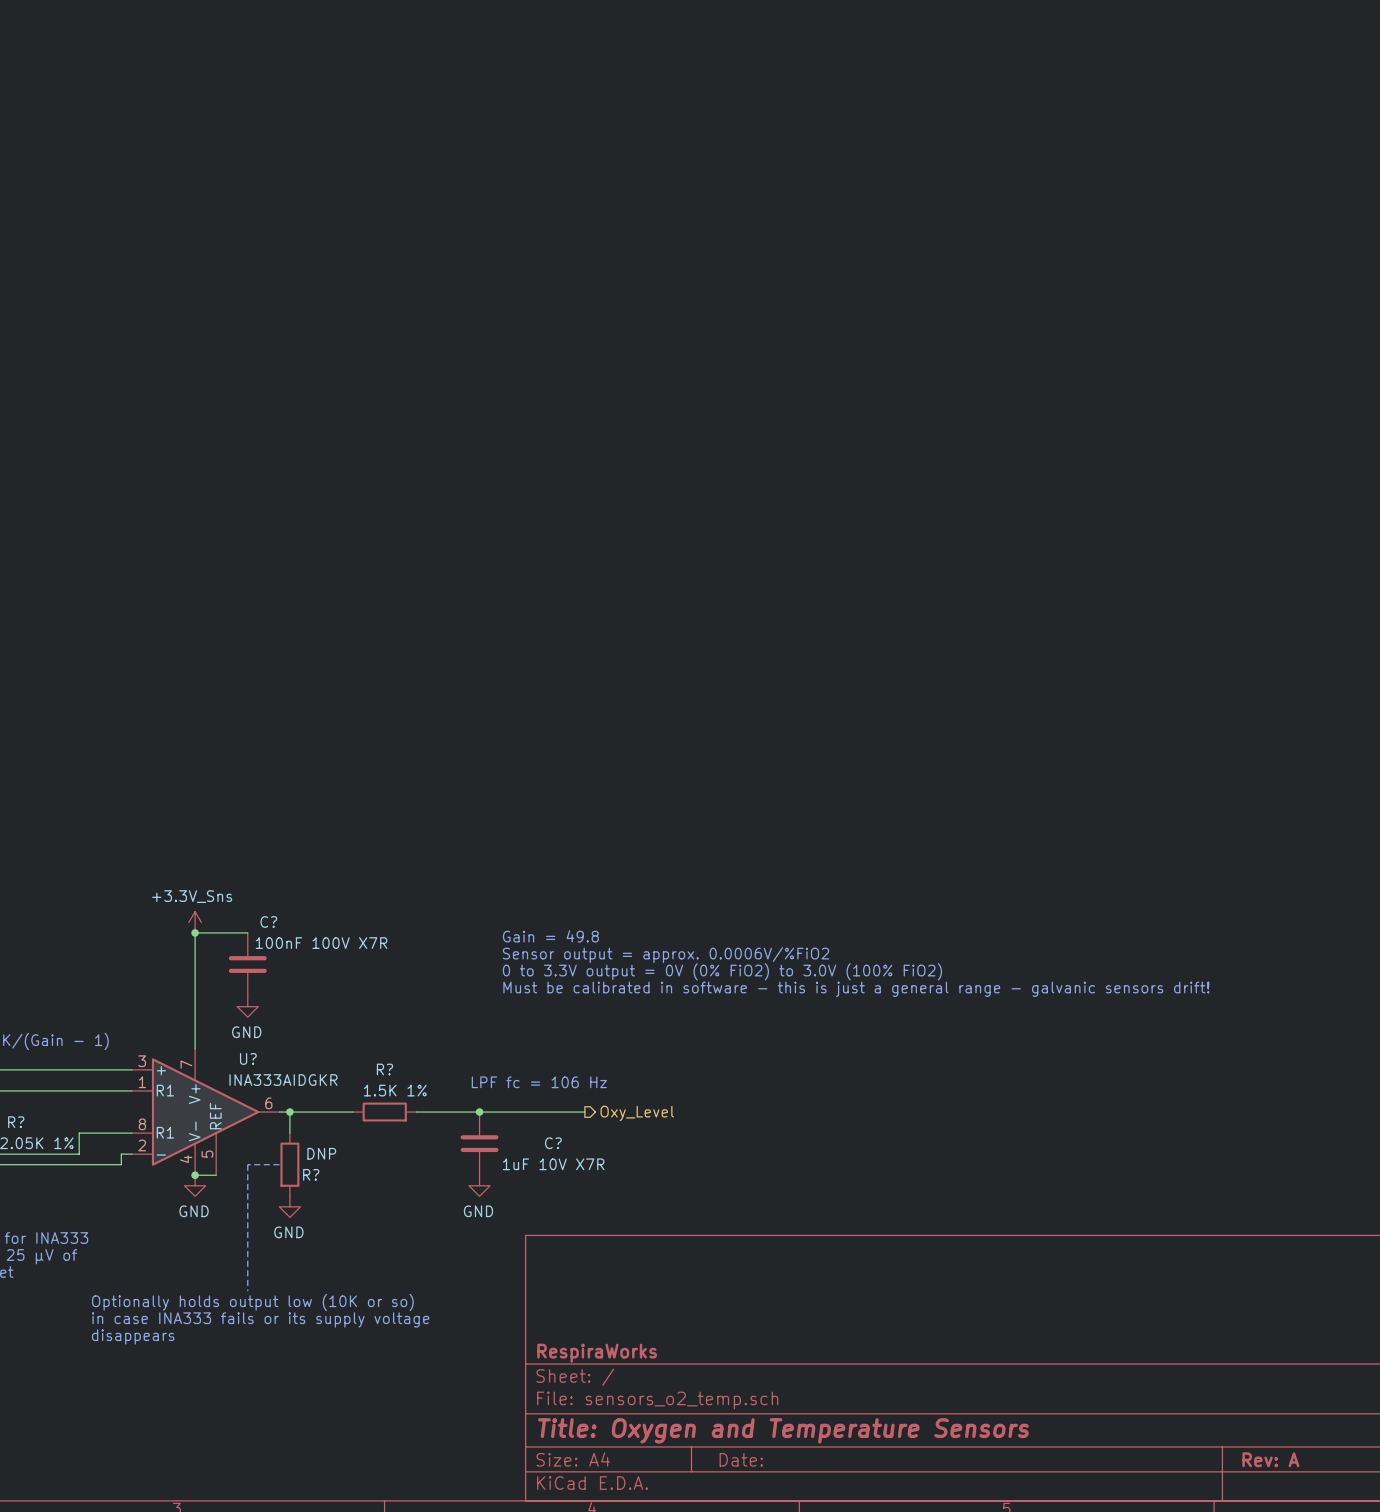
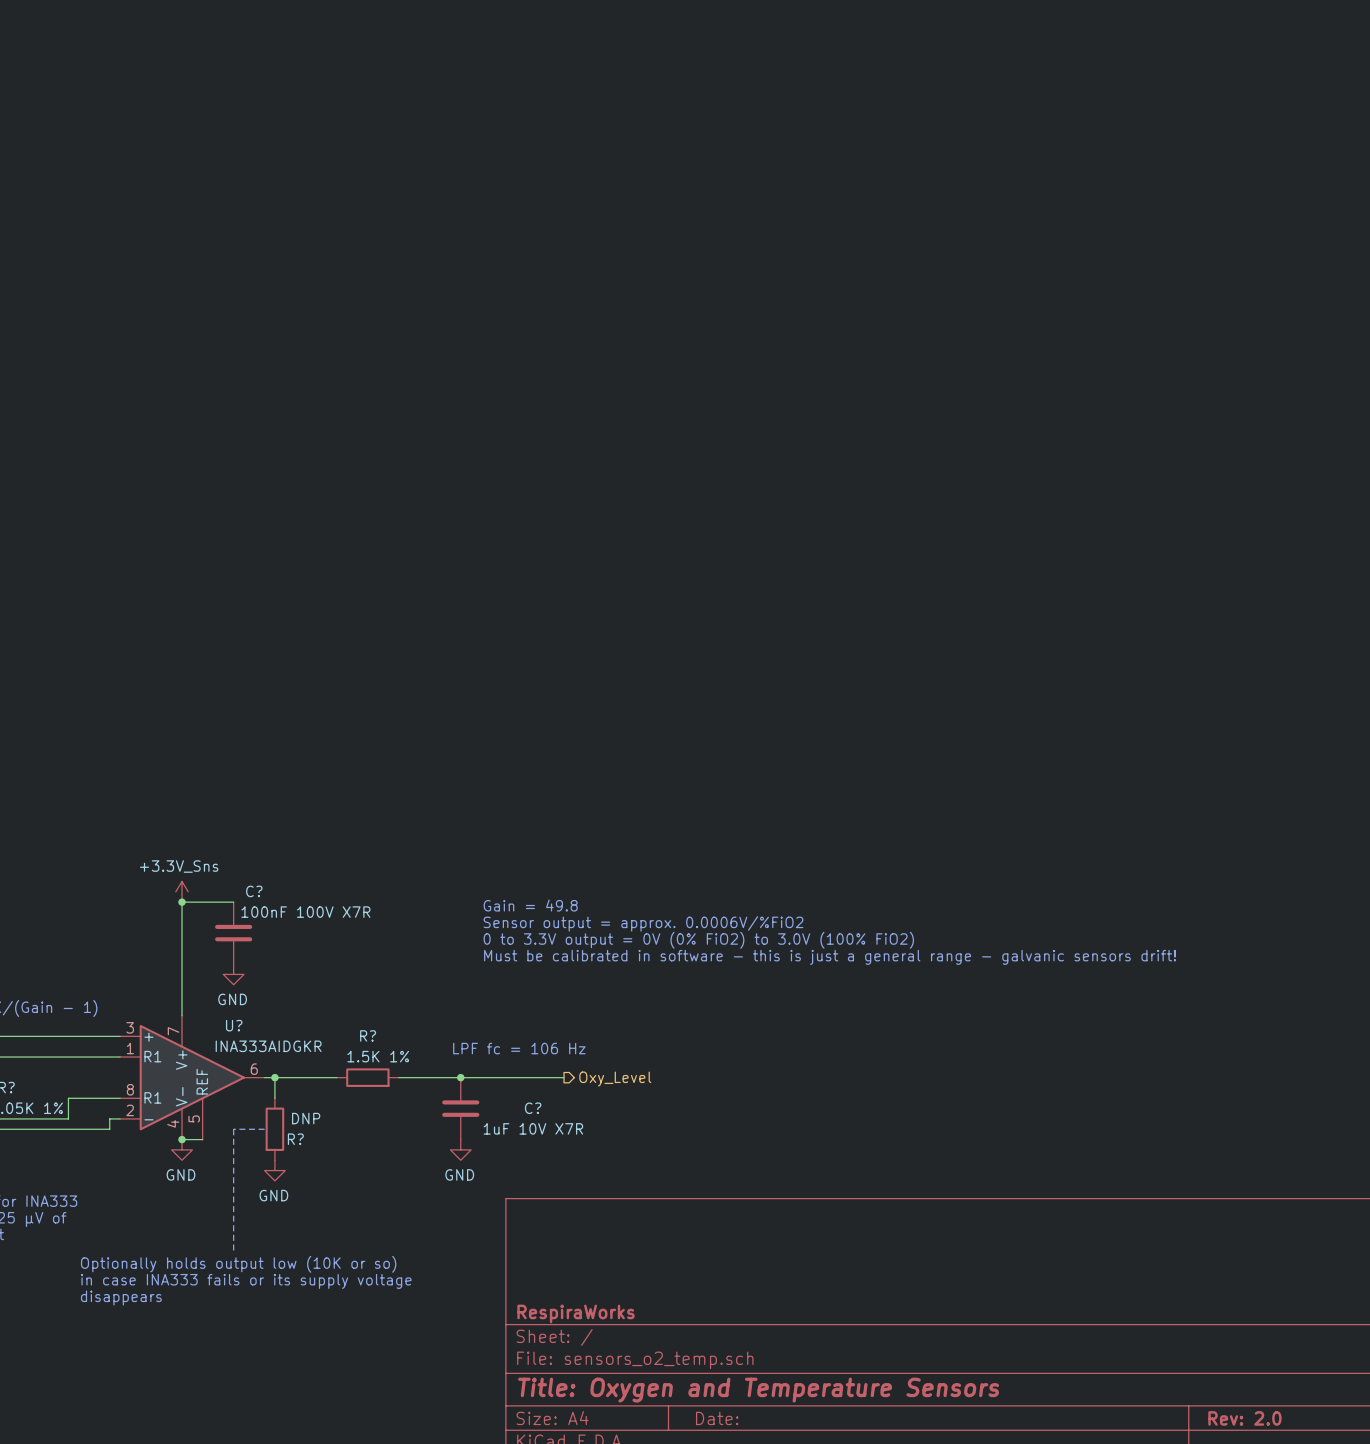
title block: Rev: A (1270, 1459) -> Rev: 2.0 (1244, 1418)

